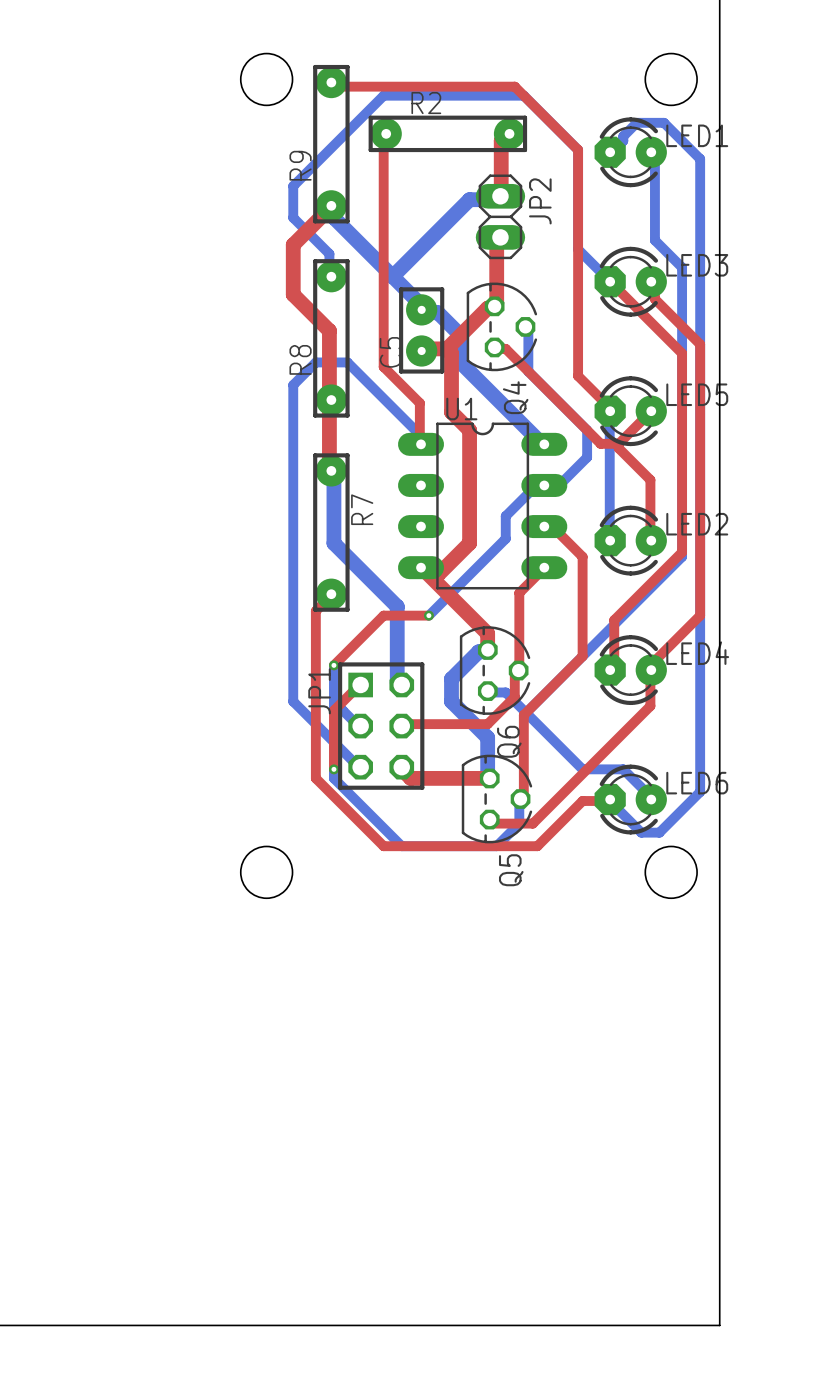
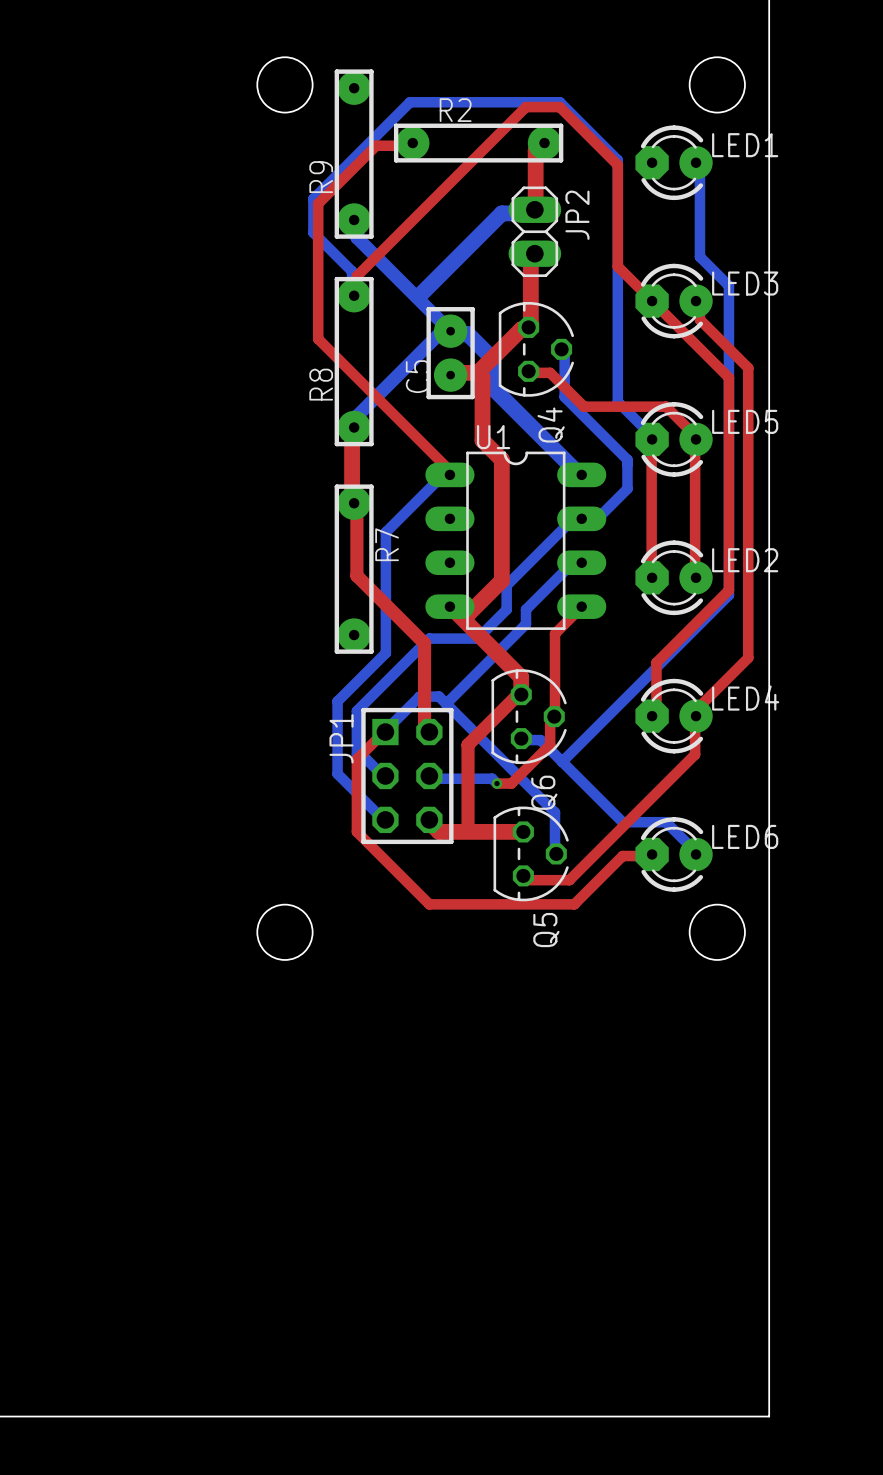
top track: (331, 82) (333, 86) (514, 86) (578, 149) (578, 154) -> (354, 295) (356, 295) (356, 276) (526, 107) (559, 107) (617, 165)
top track: (383, 136) (383, 366) (419, 403) (421, 444) -> (410, 145) (376, 145) (318, 203) (318, 339) (453, 474) (449, 474)
bottom track: (610, 152) (623, 140) (623, 136) (636, 122) (663, 122) (700, 158) (700, 791) (659, 832) (641, 832) (610, 799) -> none
top track: (331, 205) (293, 244) (293, 294) (329, 330) (329, 394) (331, 400) -> none
bottom track: (333, 217) (419, 303) (421, 309) -> (356, 232) (356, 237) (450, 331) (443, 329) (356, 416) (356, 426) (354, 427)
top track: (578, 249) (578, 376) (609, 407) (610, 411) -> (617, 266) (652, 301)
bottom track: (578, 249) (610, 281) -> (617, 266) (617, 401) (651, 435) (652, 439)
top track: (505, 348) (600, 443) (618, 443) -> (540, 372) (550, 372) (583, 406) (666, 406) (695, 435) (696, 439)
top track: none -> (652, 439) (652, 577)
bottom track: (610, 411) (610, 540) -> none
top track: (650, 412) (618, 443) -> none
top track: (618, 443) (618, 448) (650, 479) -> (695, 440) (695, 512)
bottom track: (421, 444) (419, 434) (347, 362) (315, 362) (293, 385) (293, 701) (315, 724) -> (449, 474) (448, 479) (439, 479) (385, 532) (385, 653) (337, 701) (337, 773)
top track: none -> (354, 503) (356, 503) (356, 575) (424, 643) (424, 730) (429, 732)
bottom track: (331, 470) (333, 470) (333, 543) (397, 606) (397, 683) (401, 684) -> none
bottom track: (505, 516) (505, 538) (474, 570) -> (540, 551) (506, 585) (506, 609)
top track: (544, 526) (546, 529) (555, 529) (582, 556) (582, 656) (523, 715) (523, 796) (520, 799) -> none
bottom track: none -> (581, 562) (579, 566) (569, 566) (526, 609) (526, 624) (446, 703)
top track: (331, 594) (315, 611) (315, 778) (383, 846) (401, 846) -> (356, 822) (356, 831) (429, 904)
bottom track: (446, 597) (428, 615) -> (477, 638) (429, 638) (356, 711)
top track: (428, 615) (383, 615) (333, 665) -> none
via: (428, 615) -> none
top track: none -> (521, 694) (516, 696) (468, 744) (468, 831)
bottom track: (487, 650) (487, 651) (478, 651) (451, 678) (451, 701) (487, 737) (487, 778) (489, 778) -> none
via: (333, 665) -> none
top track: (487, 724) (401, 724) (401, 726) -> (521, 773) (511, 783) (497, 783)
bottom track: none -> (429, 775) (429, 778) (492, 778) (497, 783)
via: none -> (497, 783)
bottom track: (333, 769) (333, 778) (401, 846) (496, 846) (519, 823) (520, 799) -> (385, 732) (419, 696) (439, 696) (555, 812) (556, 853)
via: (333, 769) -> none

